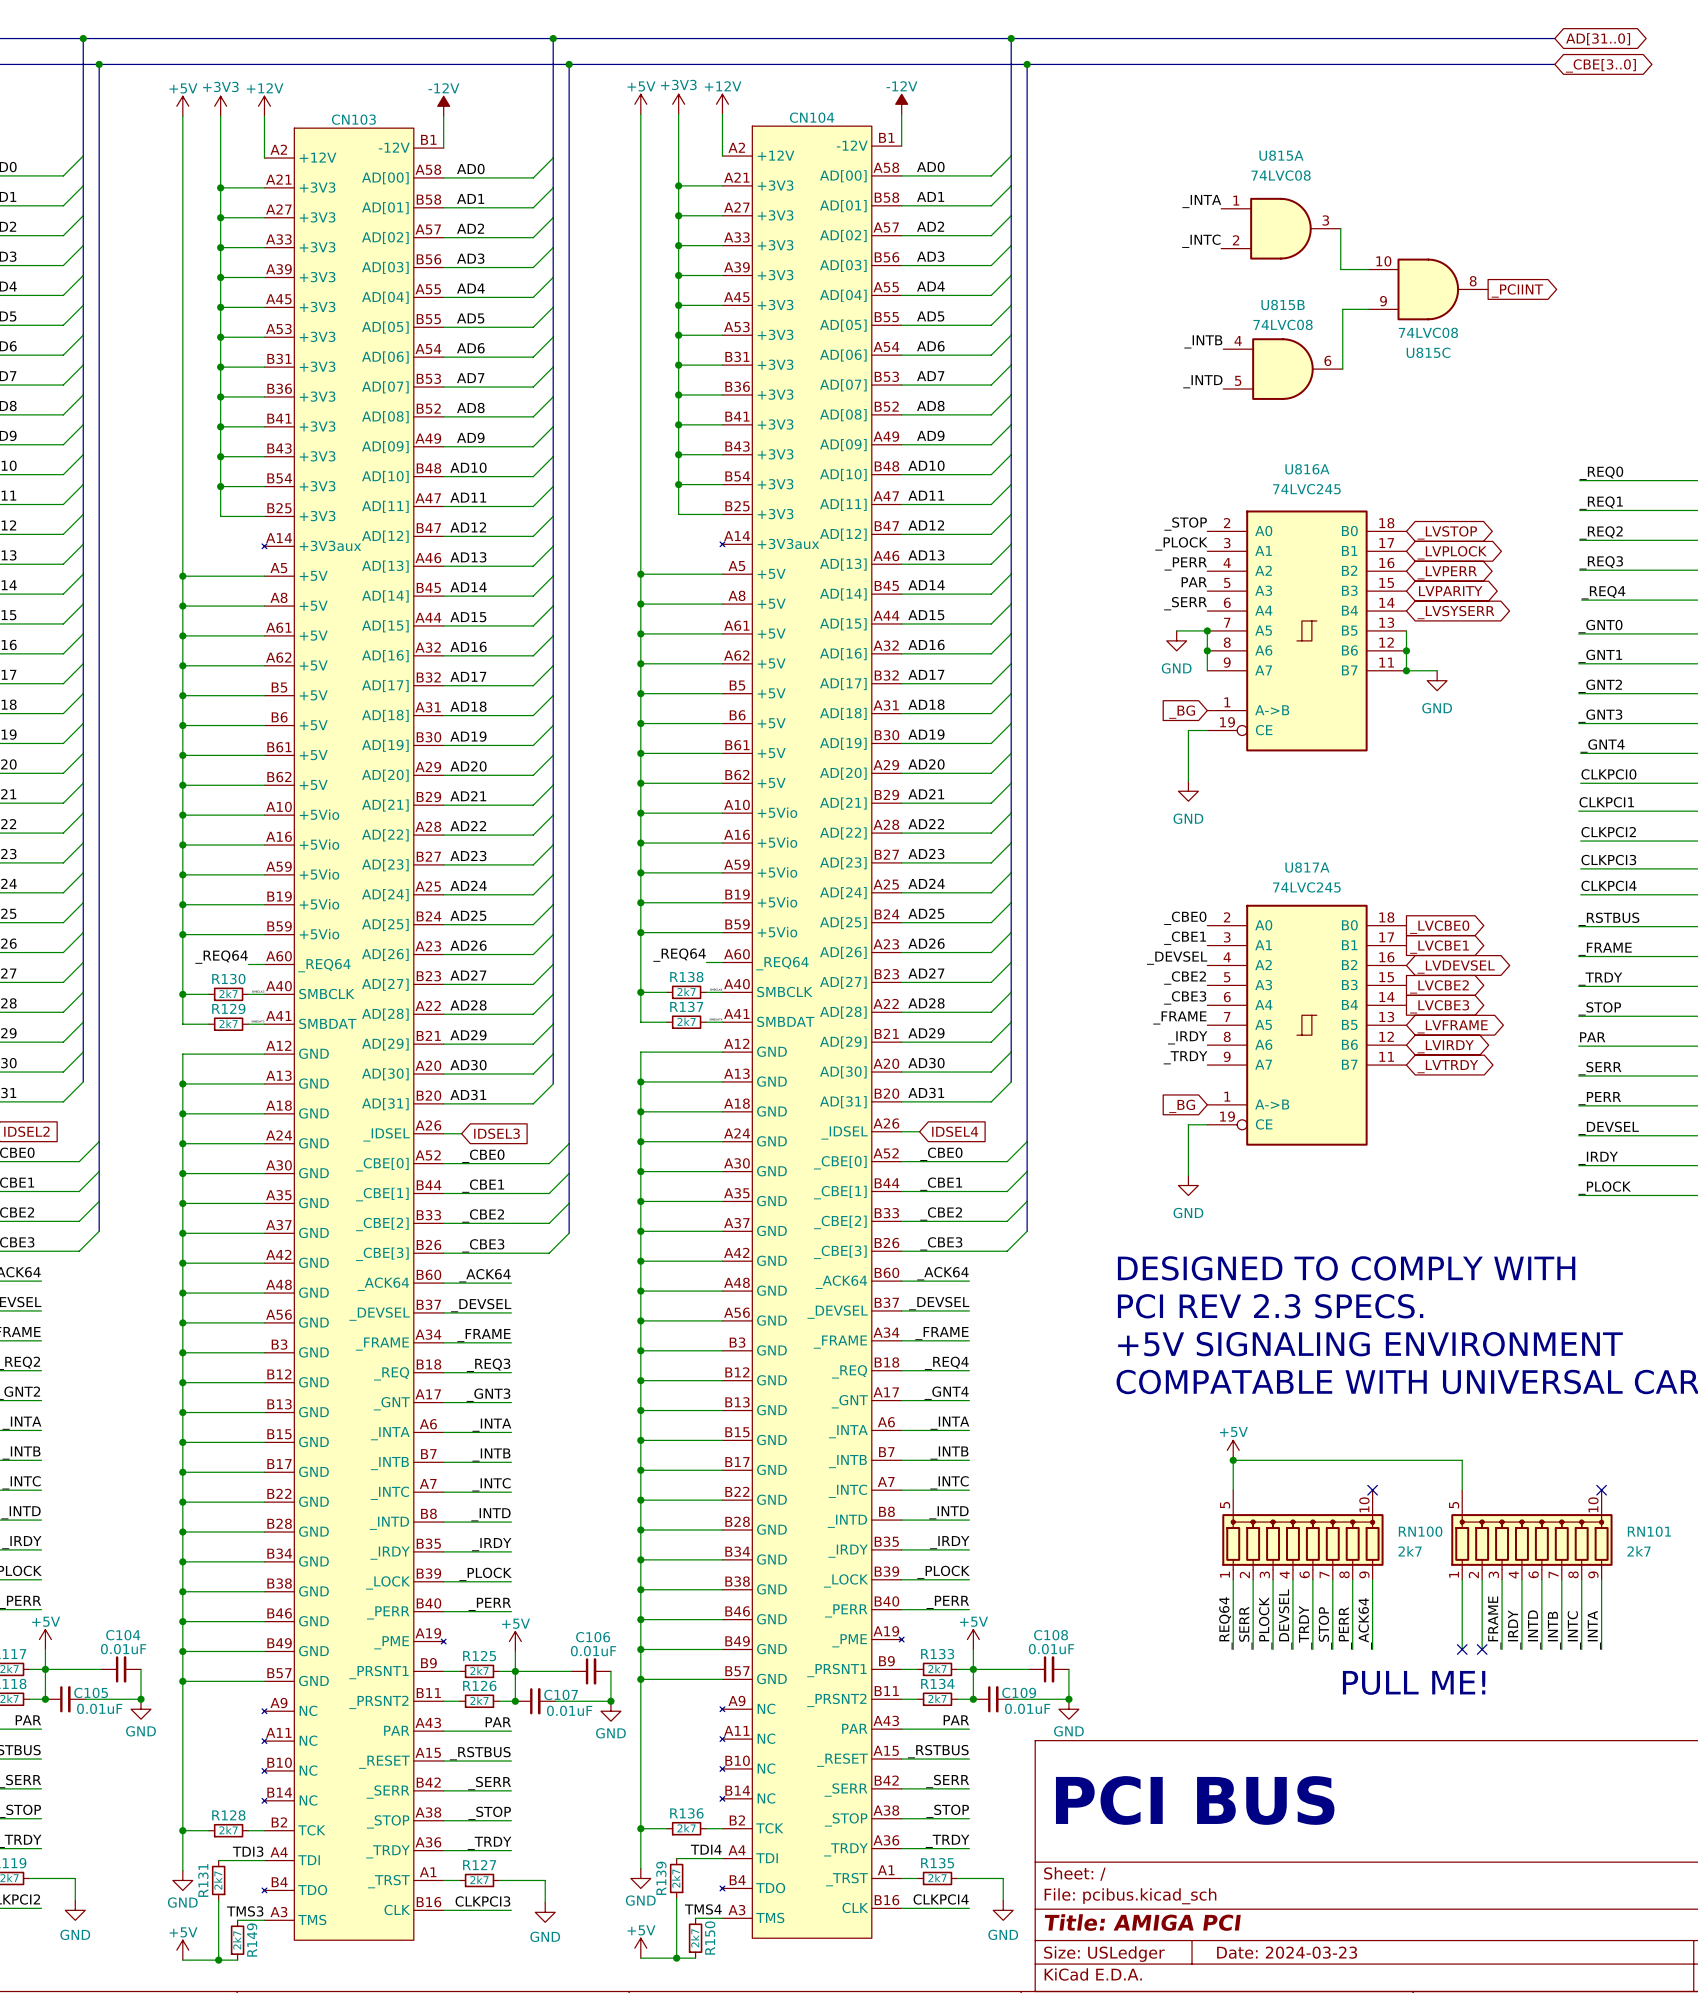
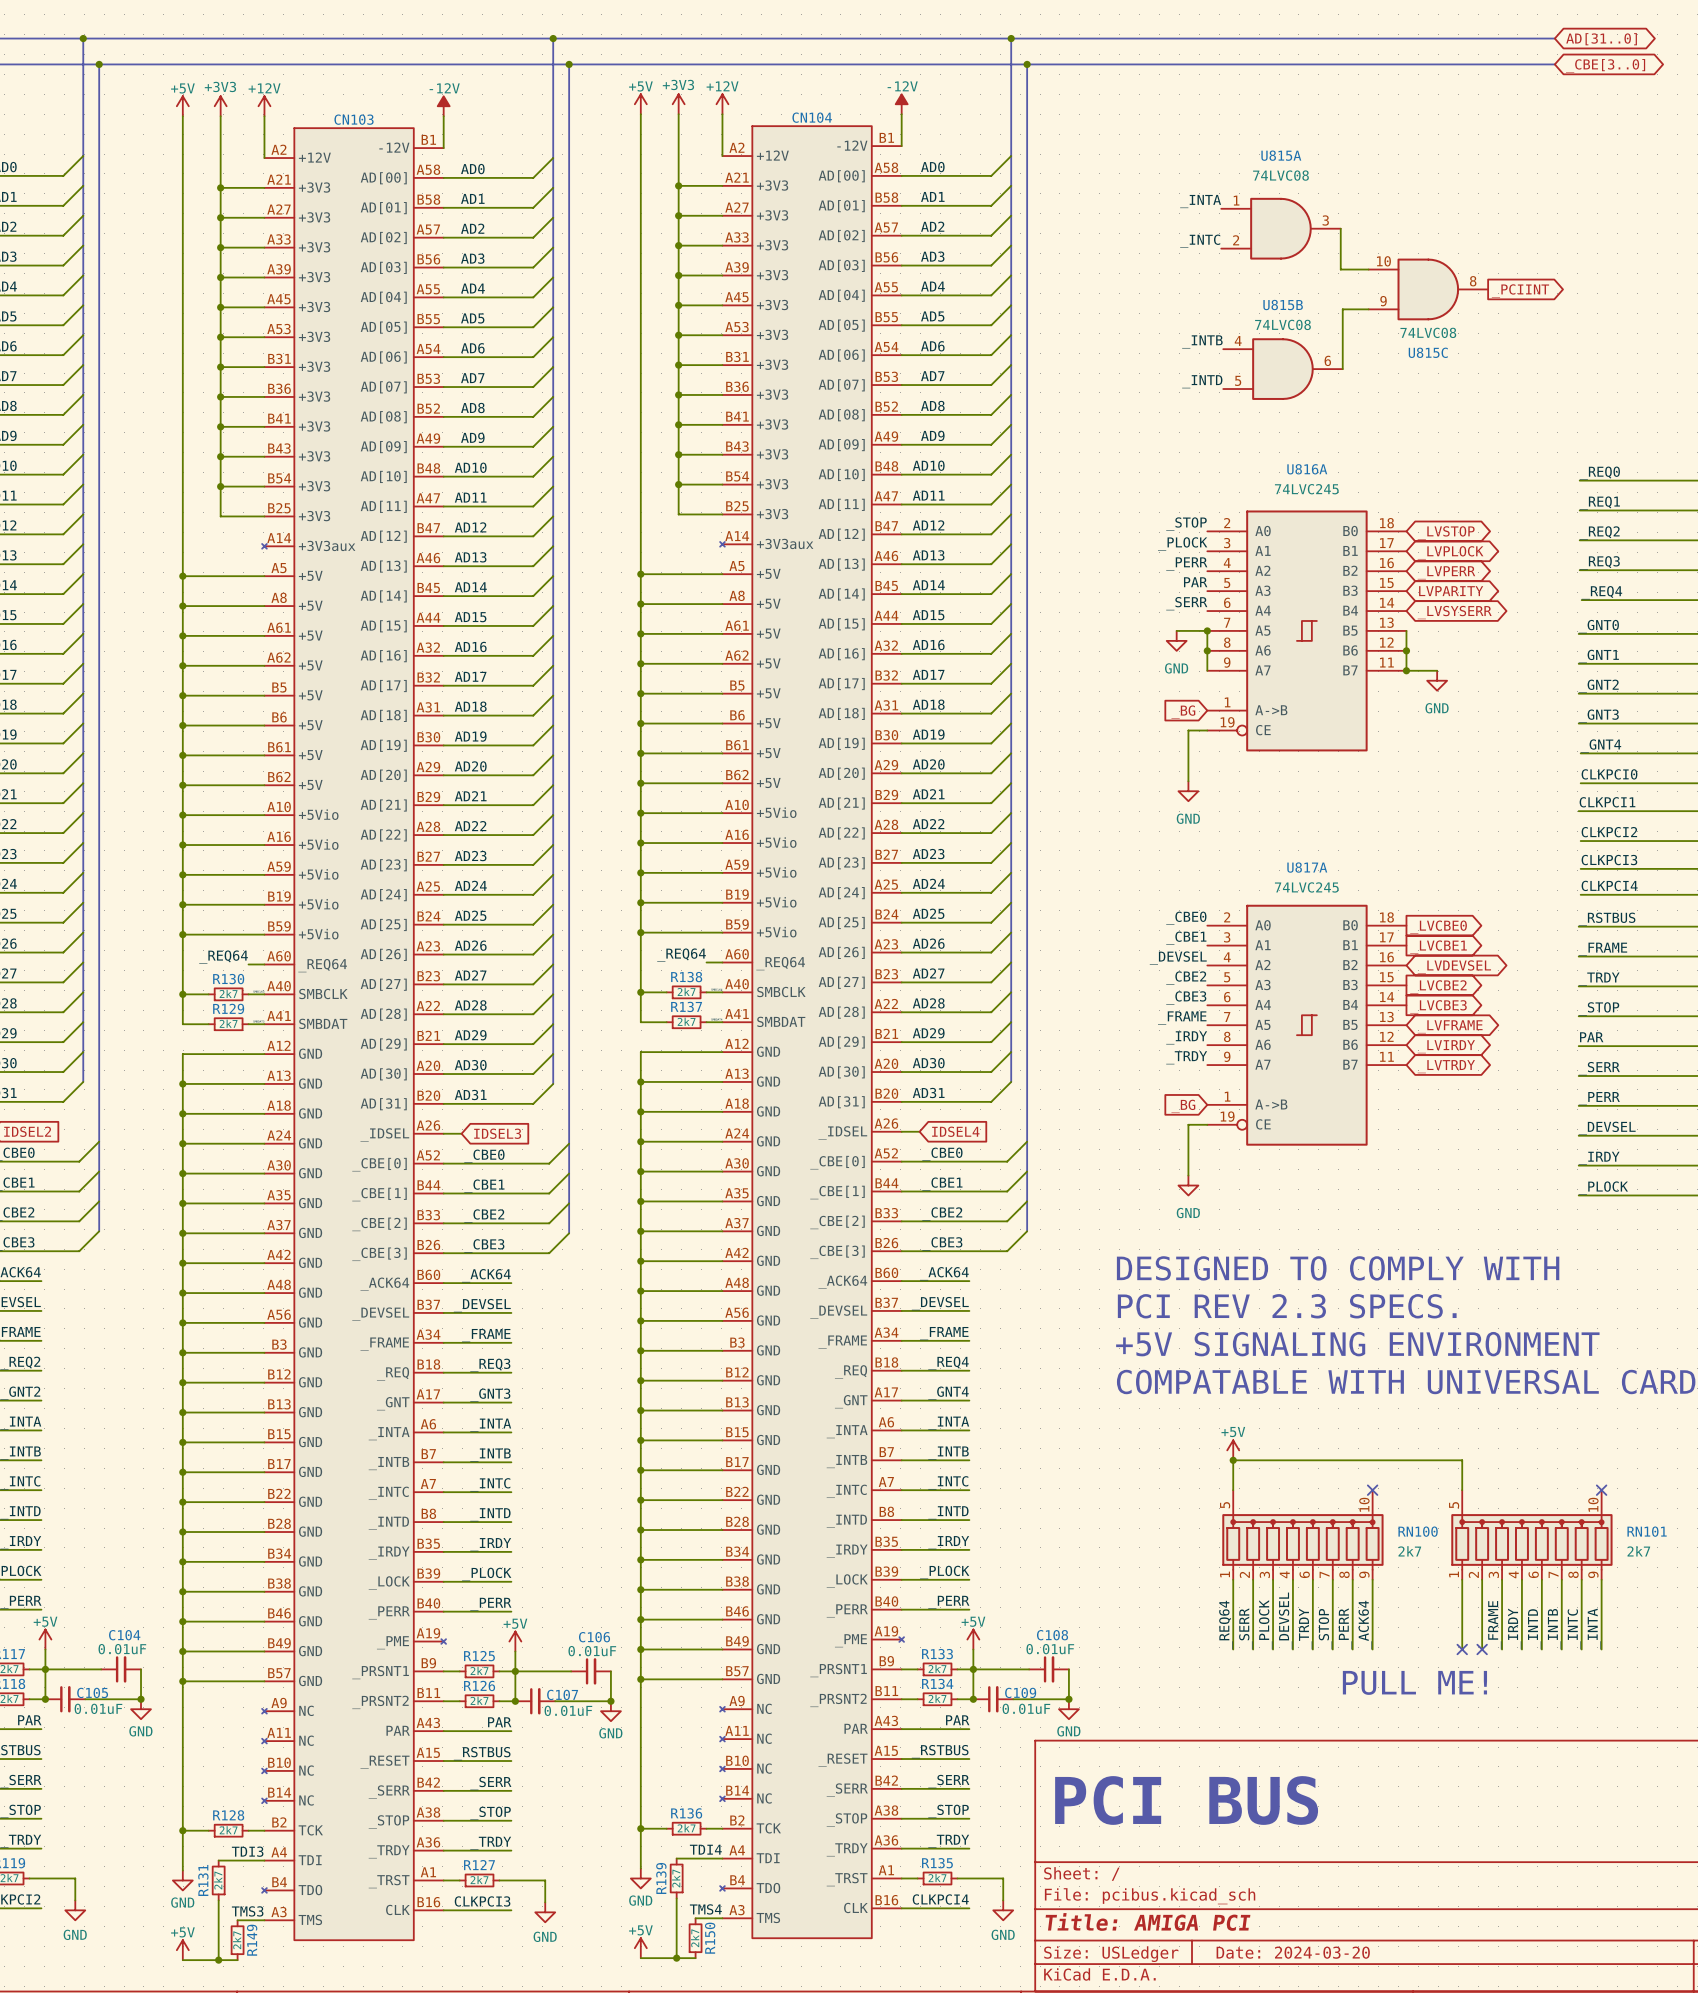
title block: Date: 2024-03-23 (1287, 1952) -> Date: 2024-03-20 (1293, 1952)

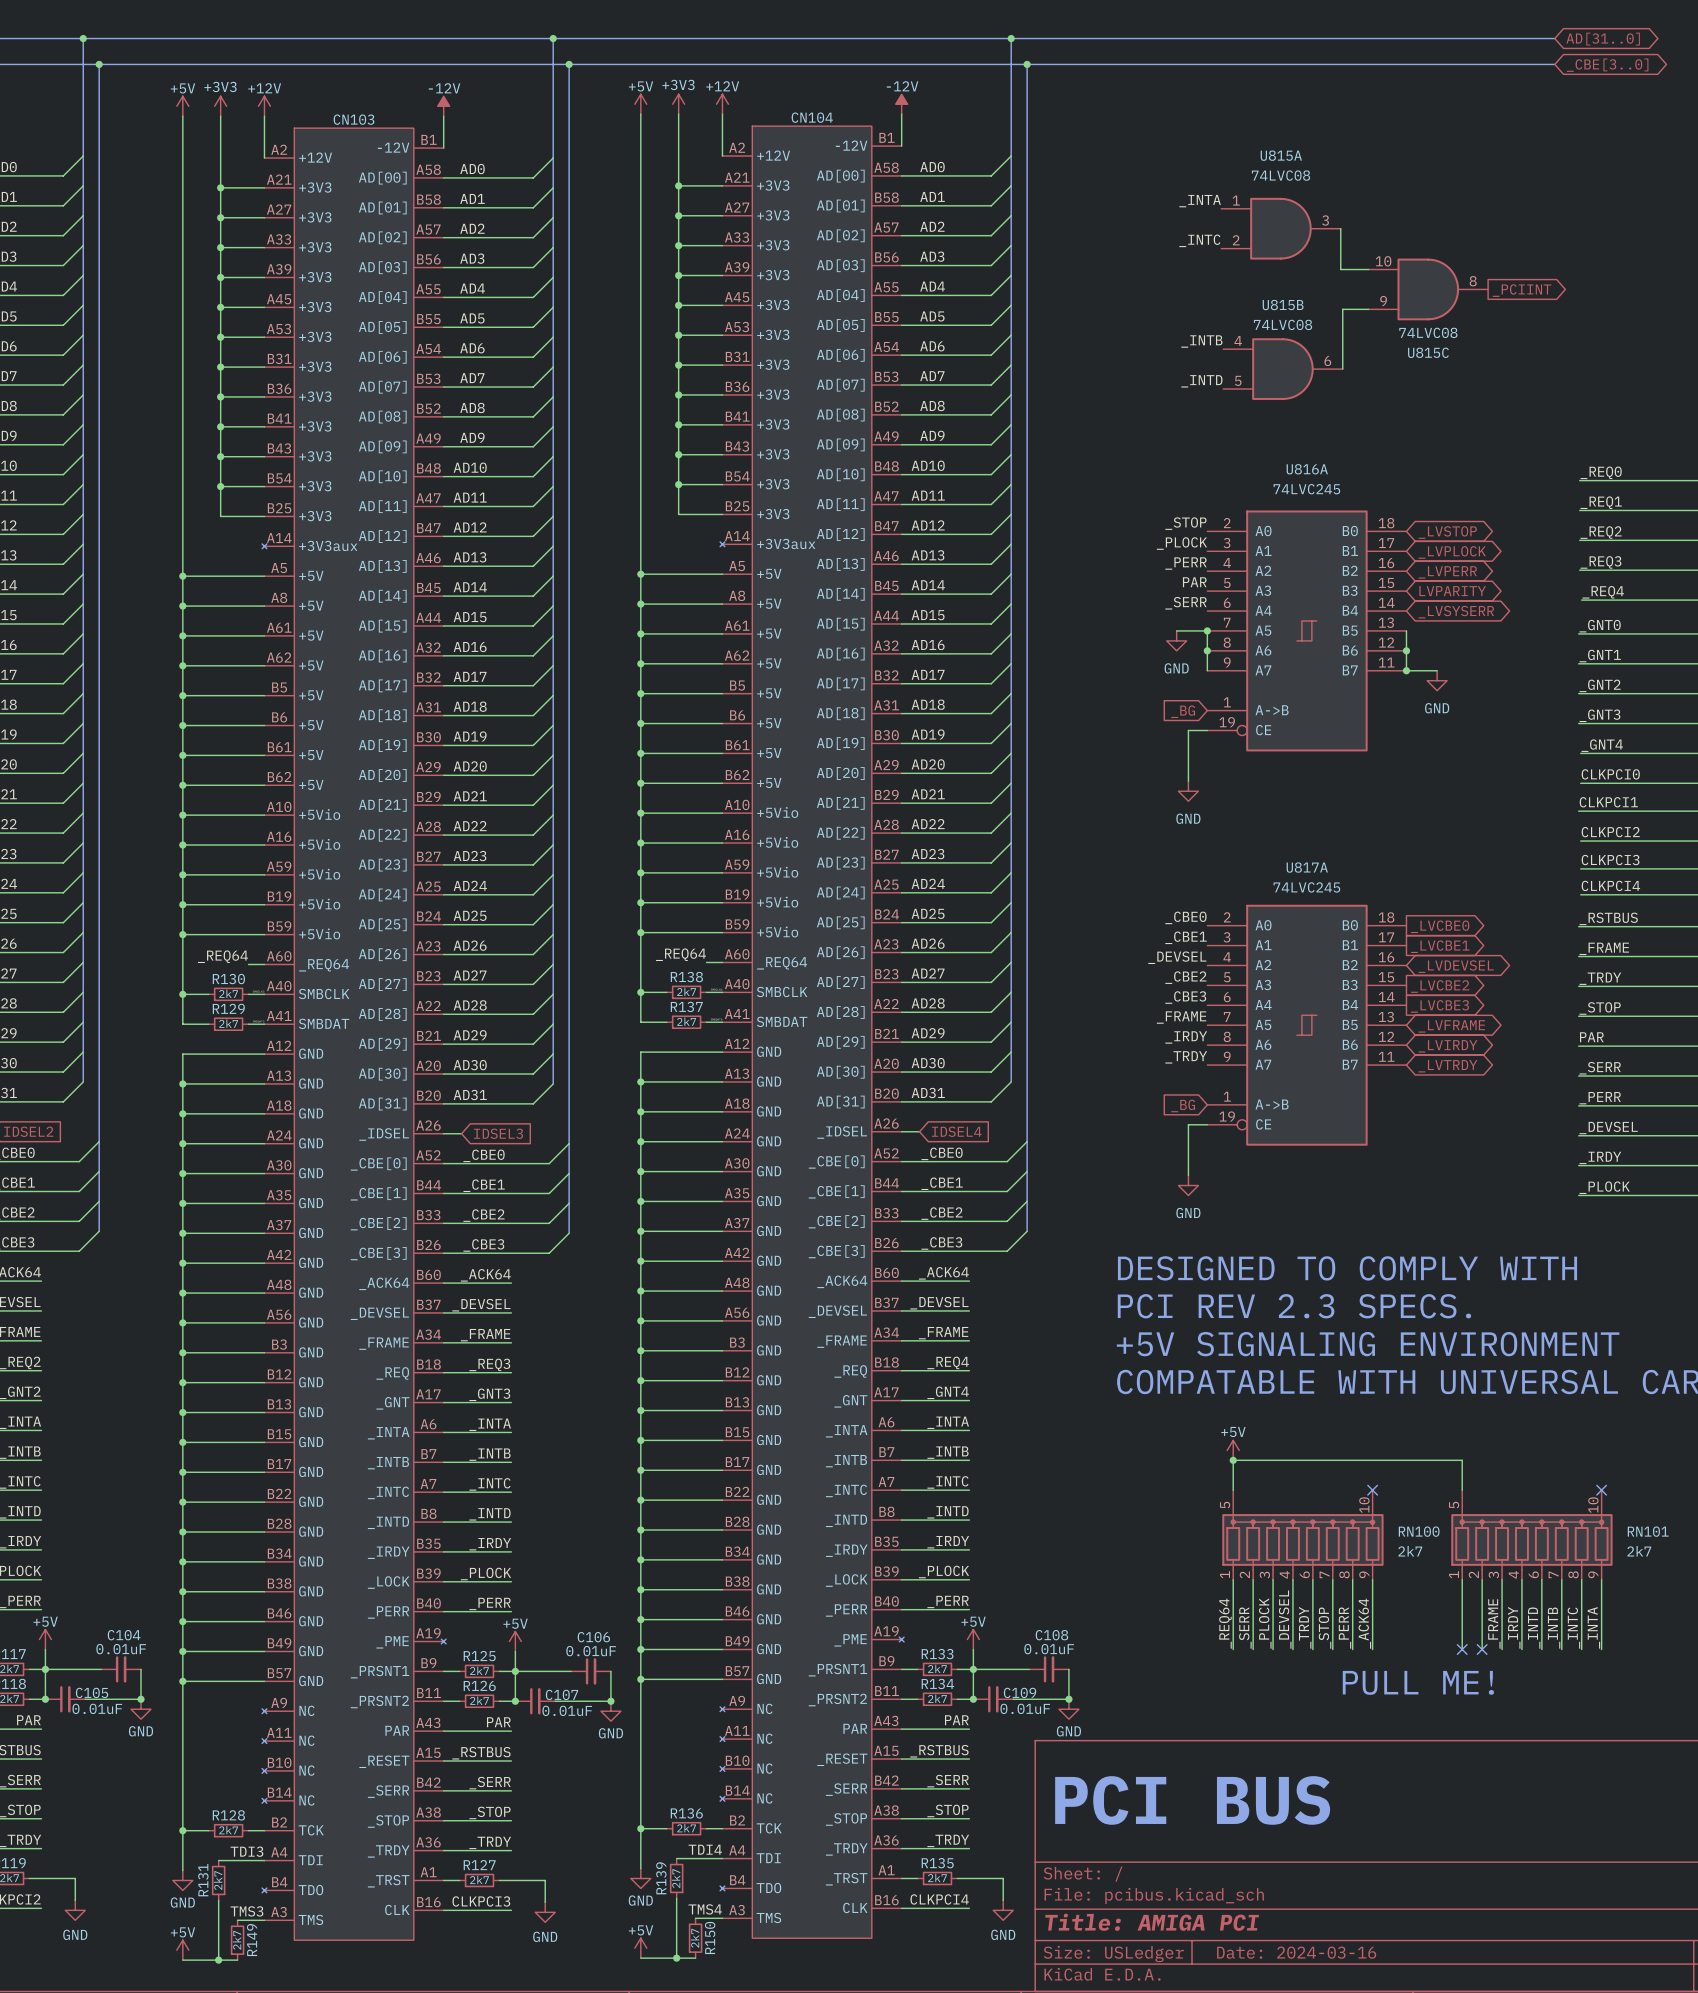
title block: Date: 2024-03-20 (1293, 1952) -> Date: 2024-03-16 (1296, 1952)

